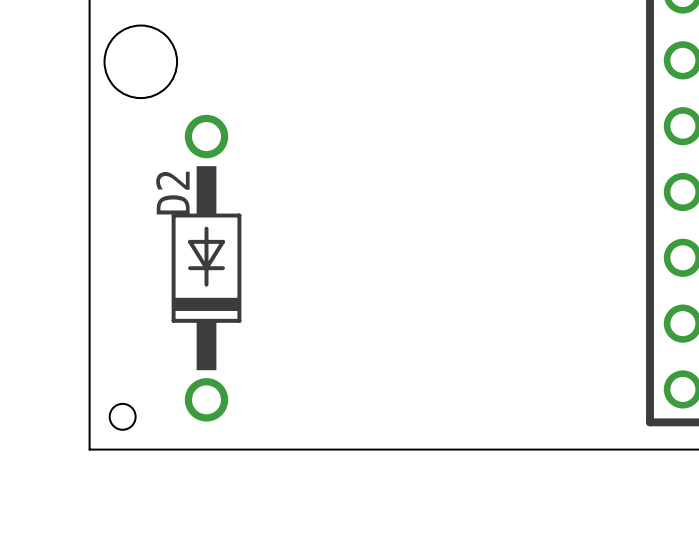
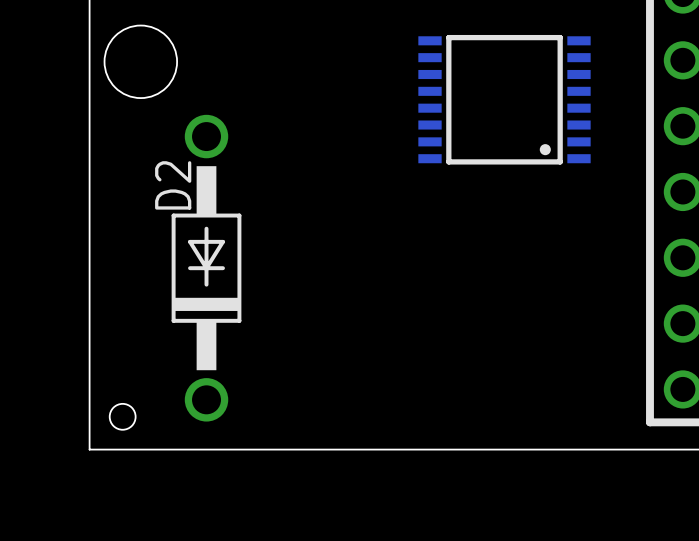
part: none -> (504, 99)

